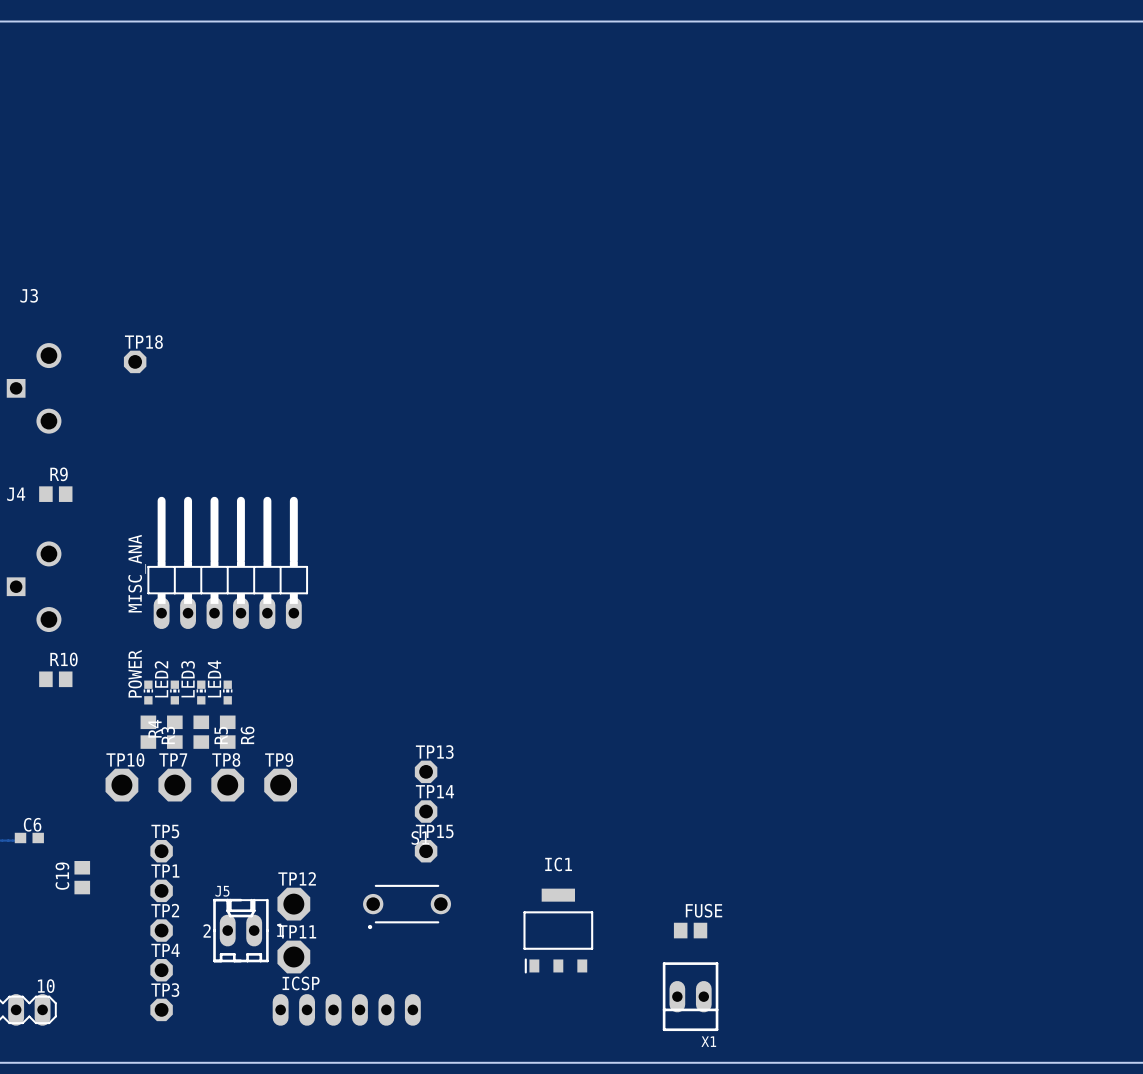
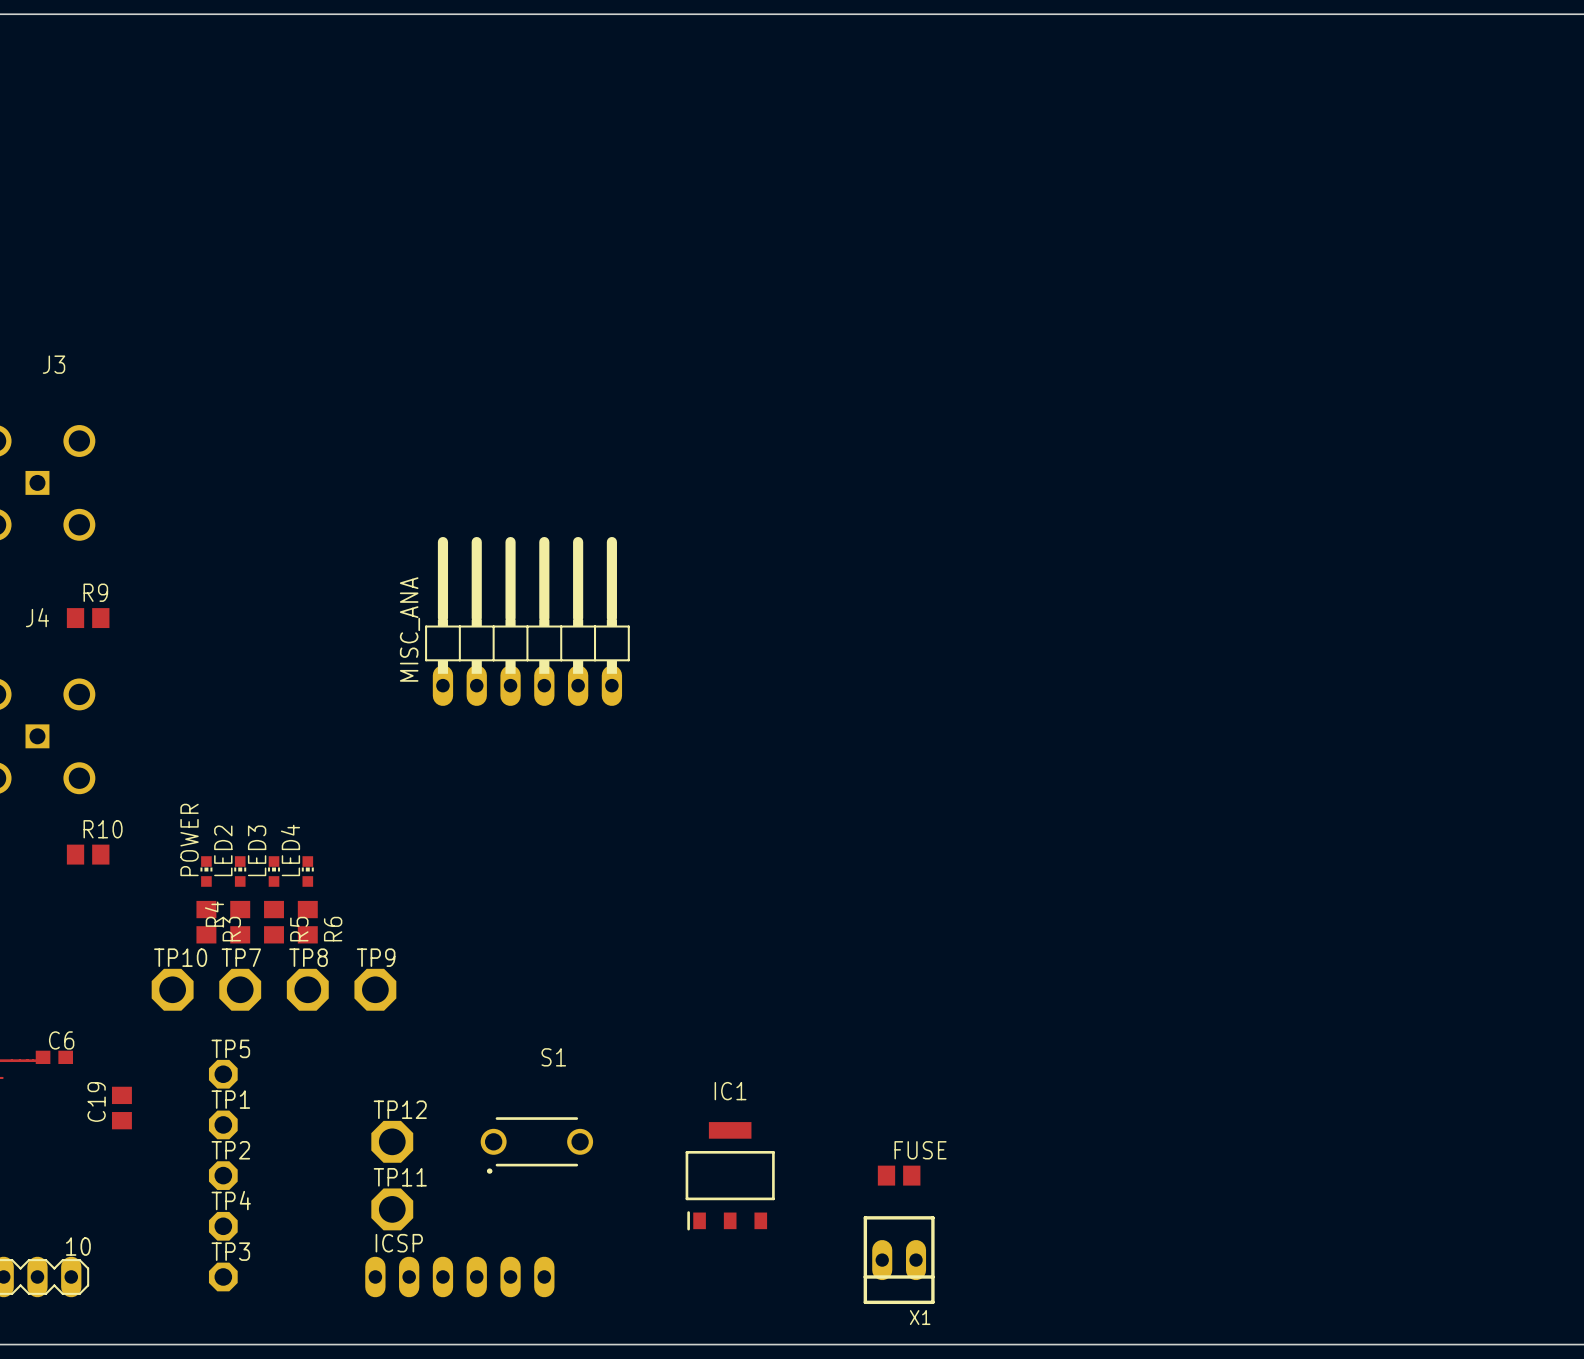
TP18: (135, 361) -> none
MISC_ANA position: (227, 562) -> (527, 621)
TP13: (426, 771) -> none
TP14: (426, 811) -> none
TP15: (426, 851) -> none
J5: (240, 930) -> none

